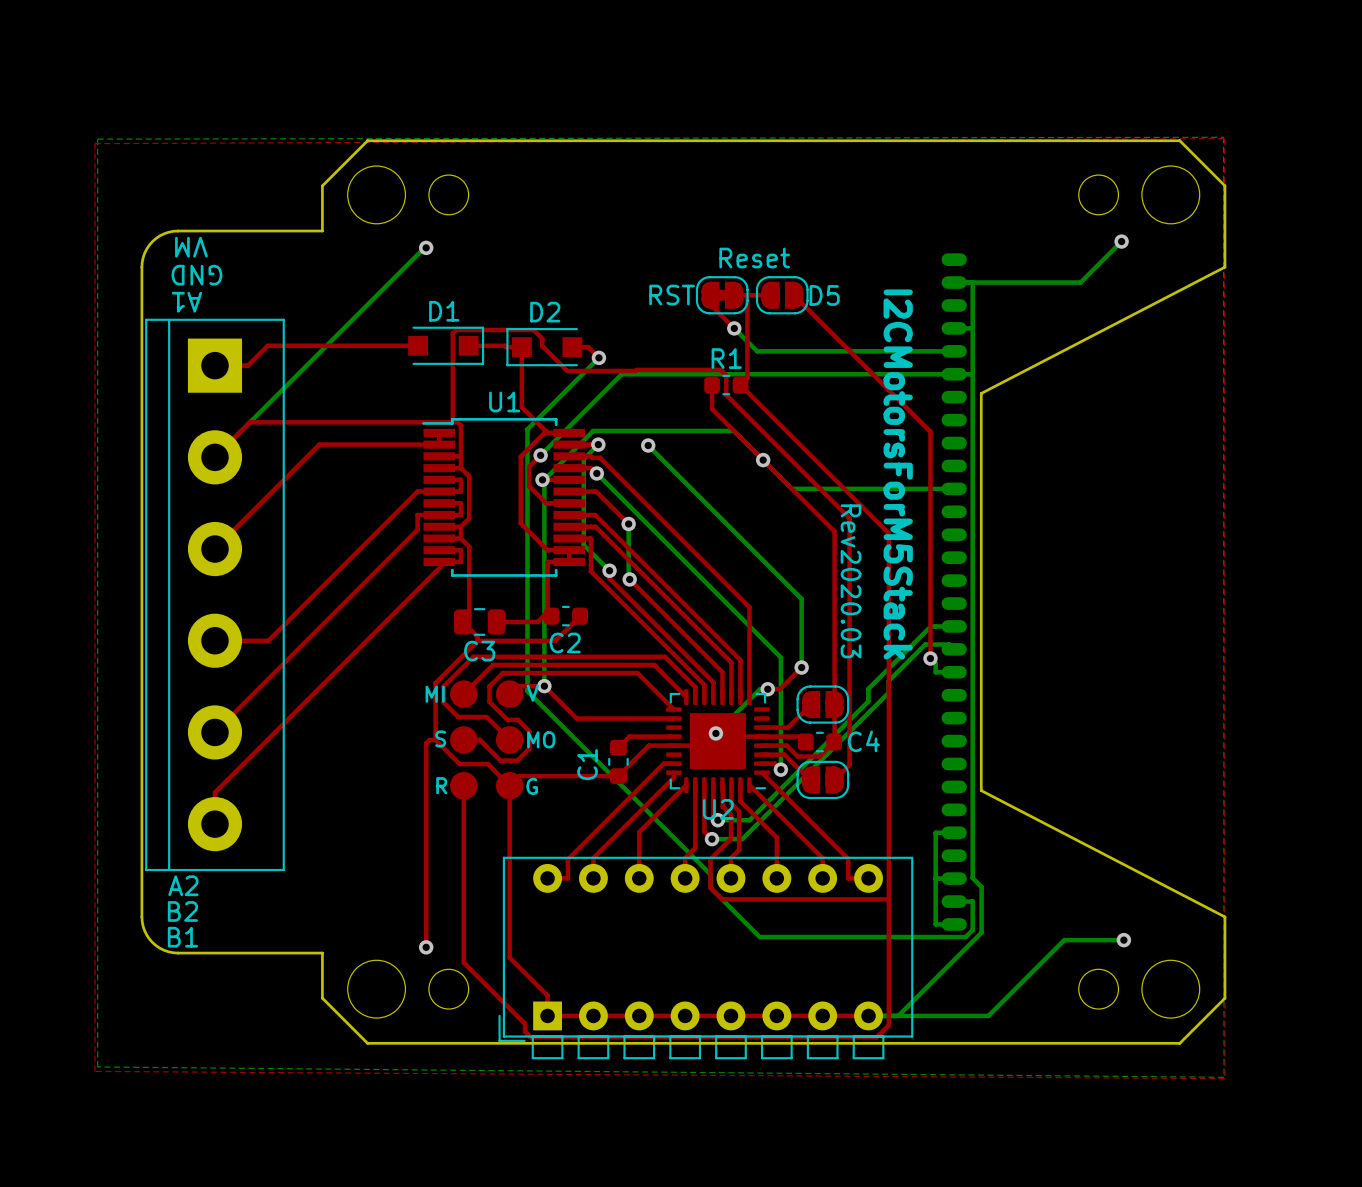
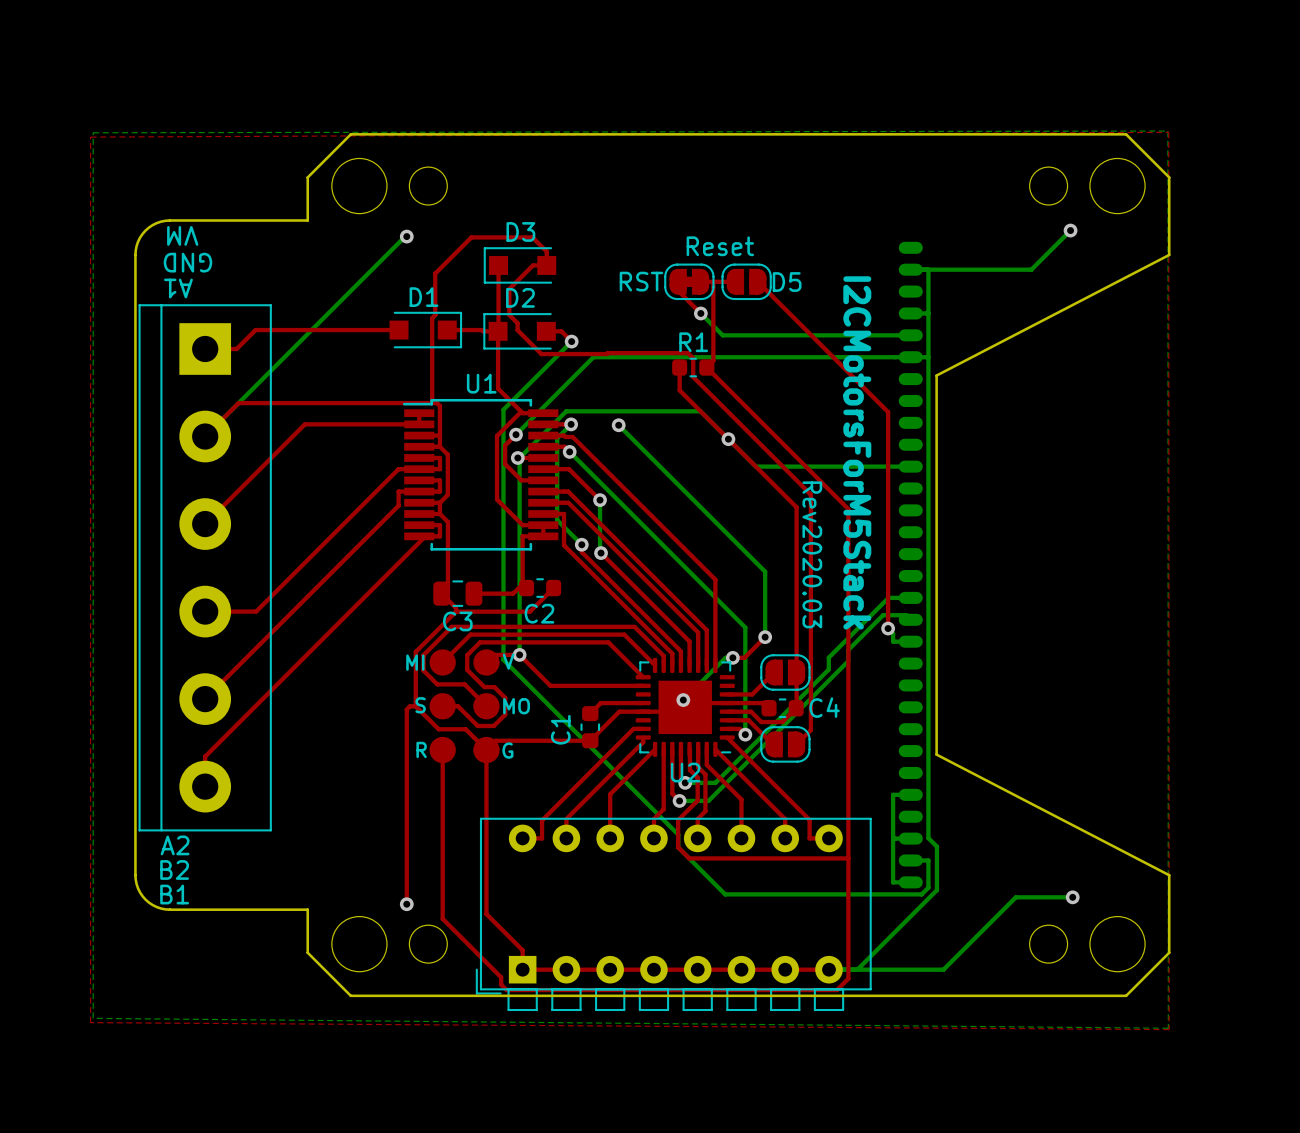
top track: none -> (498, 265) (498, 331)
D3: none -> (519, 265)
top track: (533, 329) (456, 329) (452, 333) -> (509, 314) (509, 289) (532, 265) (546, 265) (546, 251) (532, 237) (471, 237) (435, 273) (435, 314) (432, 318)

